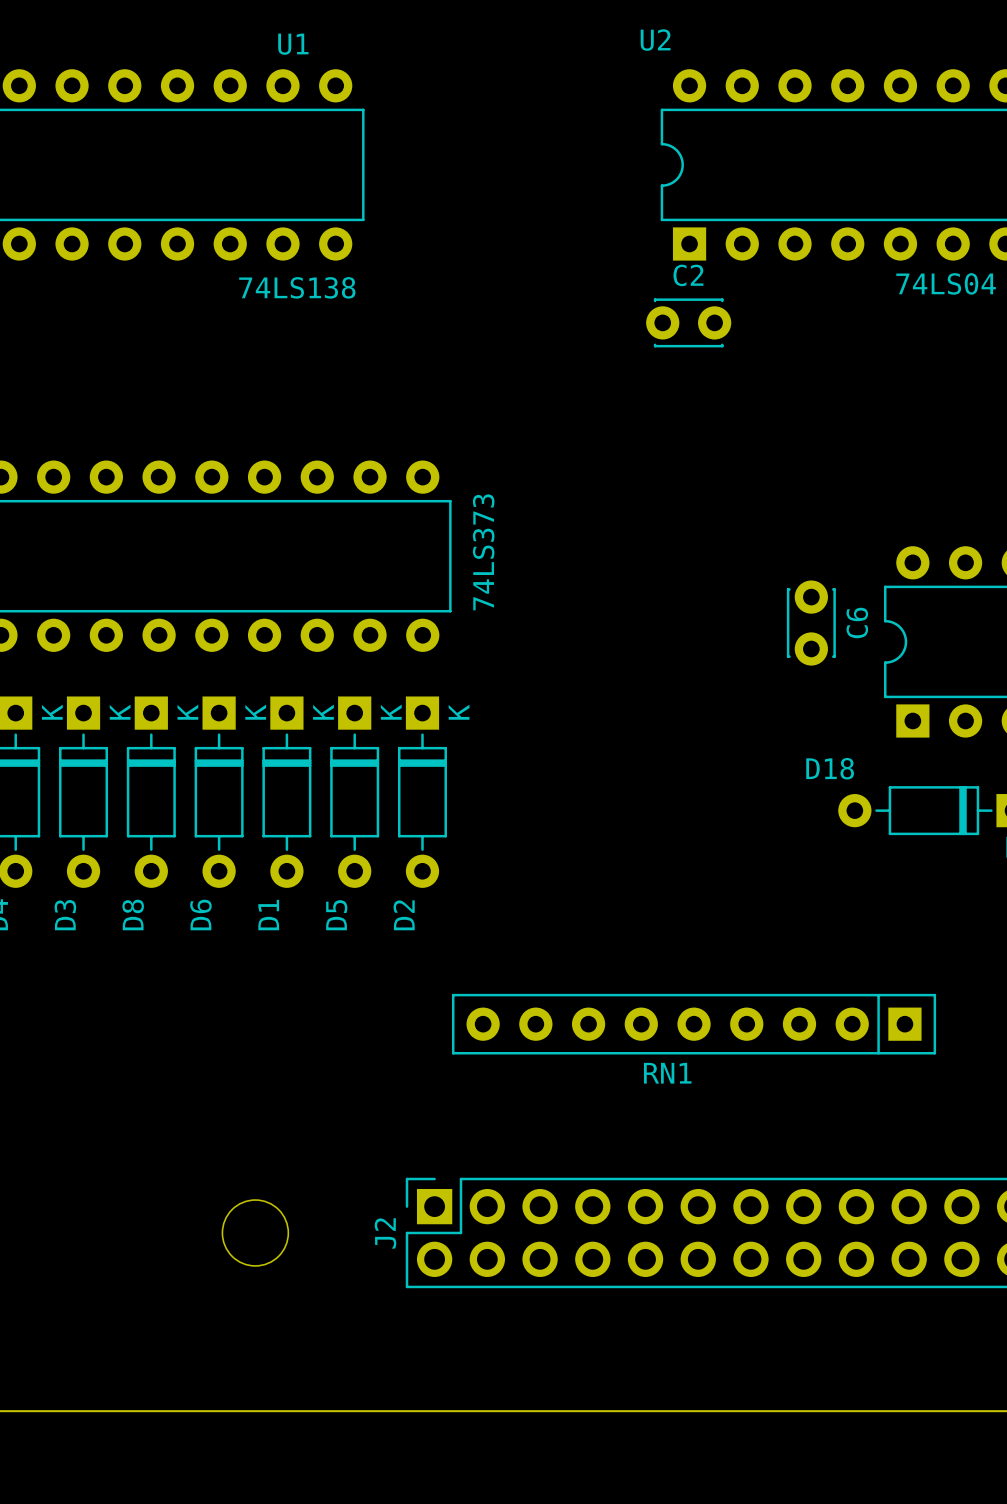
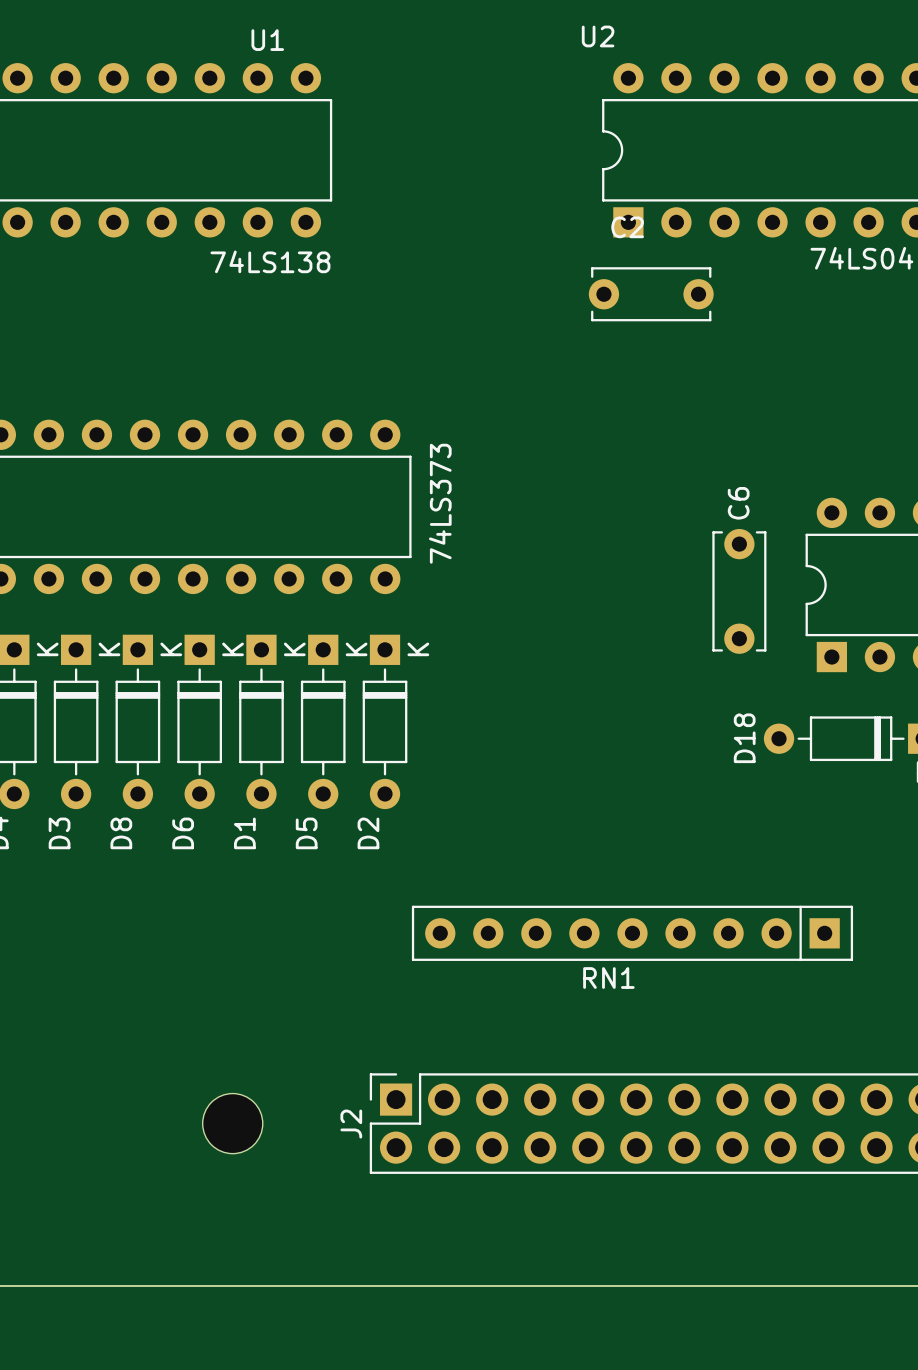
C2 footprint: [646, 298, 732, 348] -> [588, 267, 714, 322]
C6 footprint: [786, 580, 836, 666] -> [712, 528, 767, 654]
C6 name position: C6 (857, 622) -> C6 (738, 503)
D18 name rotation: 0° (830, 768) -> 90° counterclockwise (744, 738)

